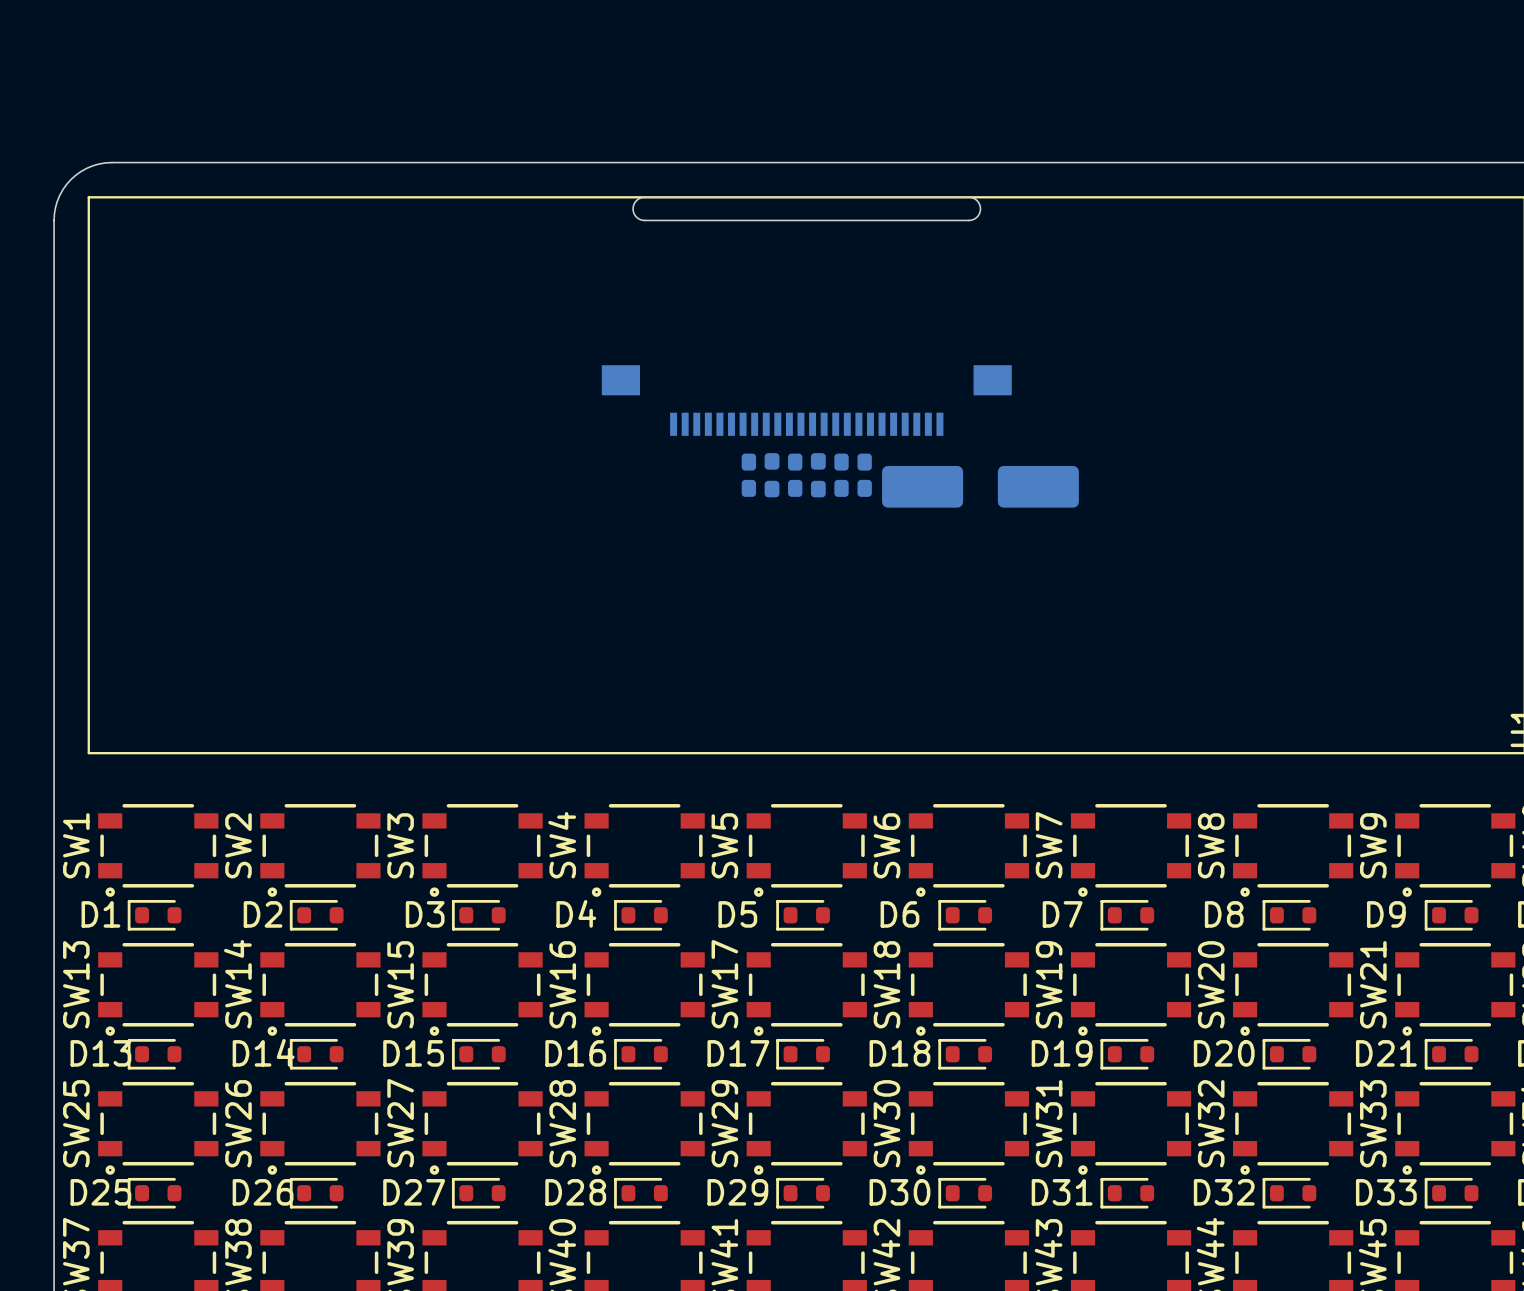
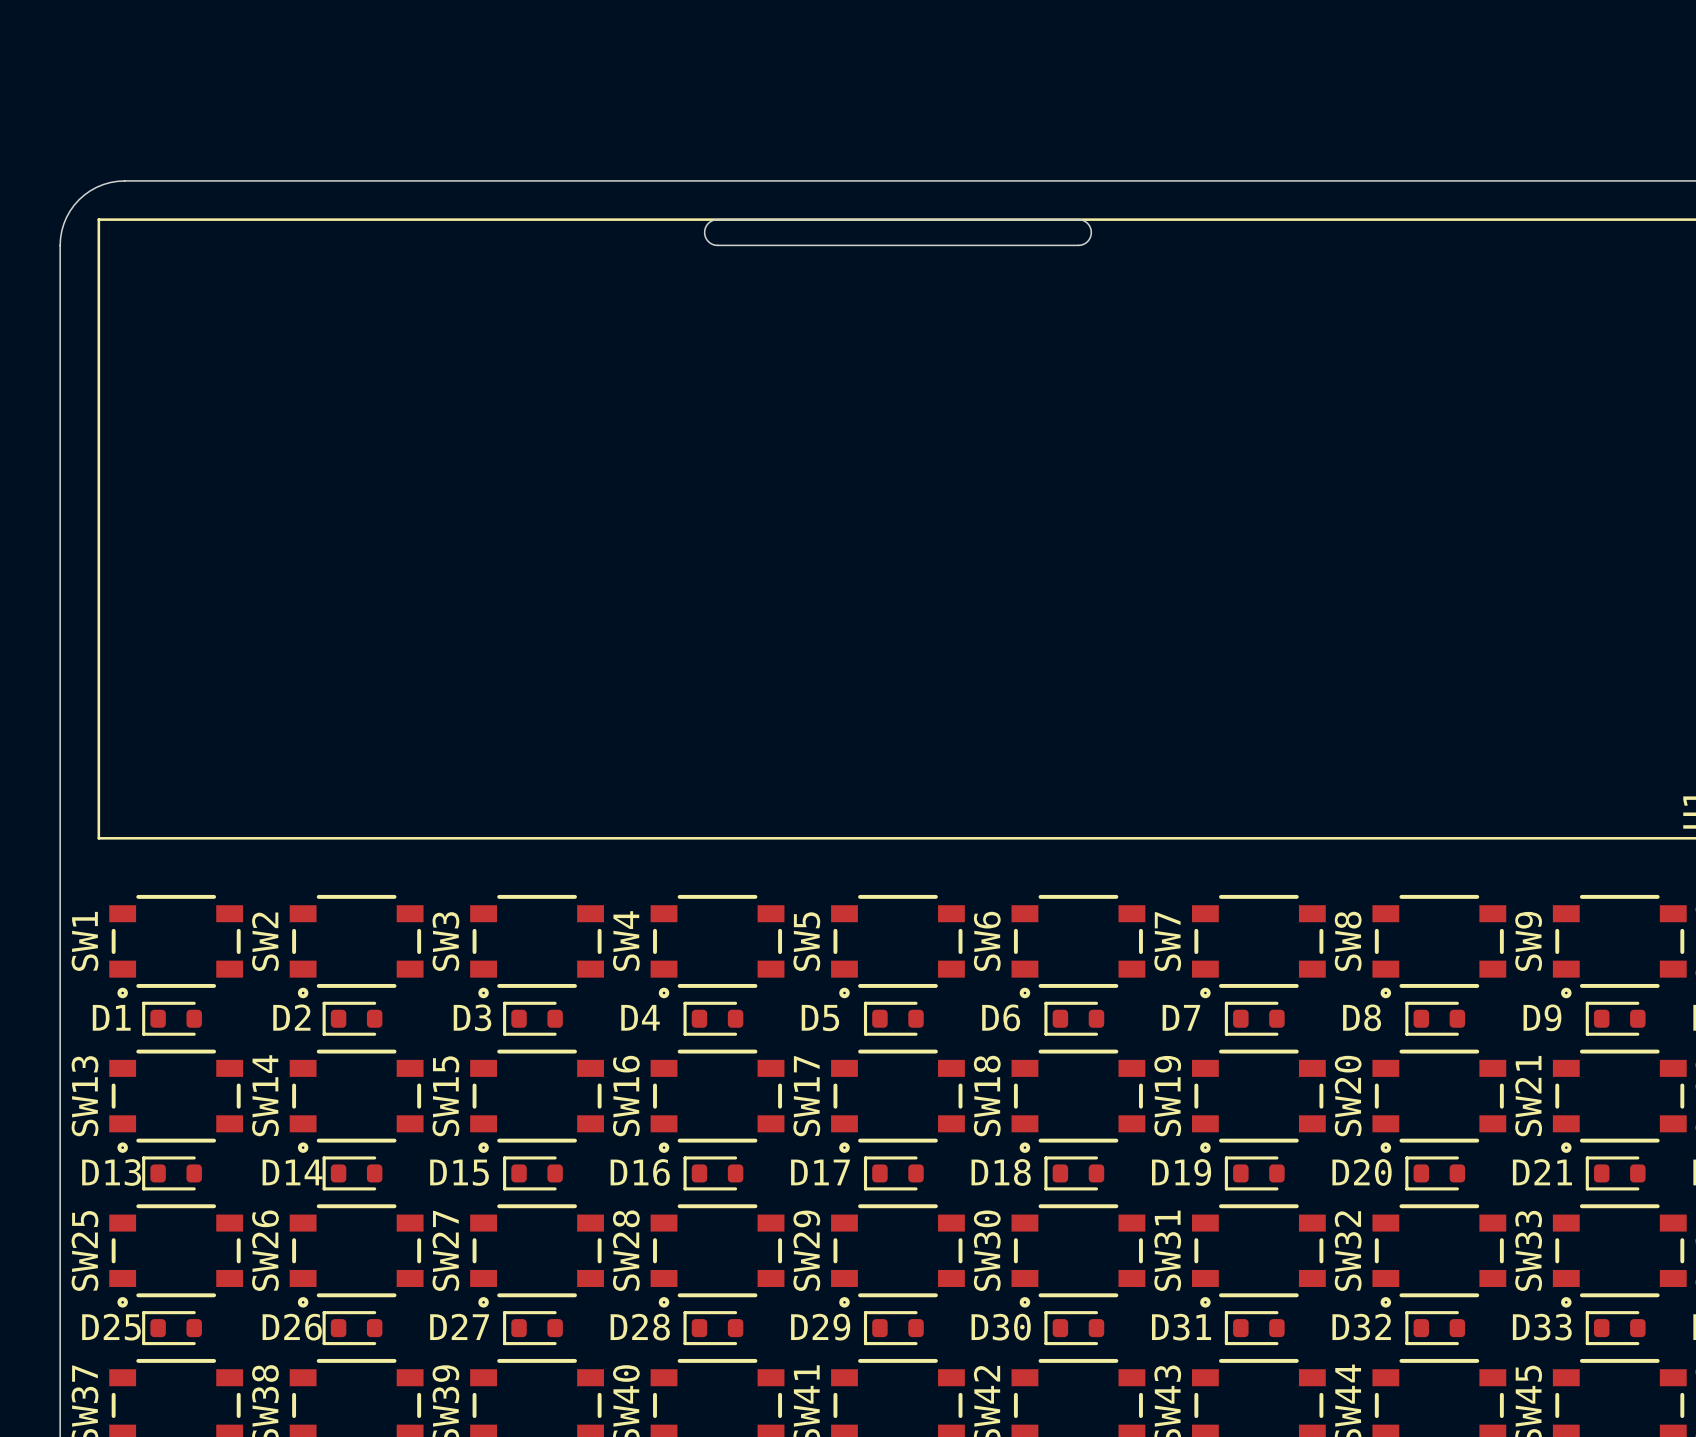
part: (806, 400) -> none
part: (748, 475) -> none
part: (772, 475) -> none
part: (795, 475) -> none
part: (818, 475) -> none
part: (841, 475) -> none
part: (864, 475) -> none
part: (980, 486) -> none

